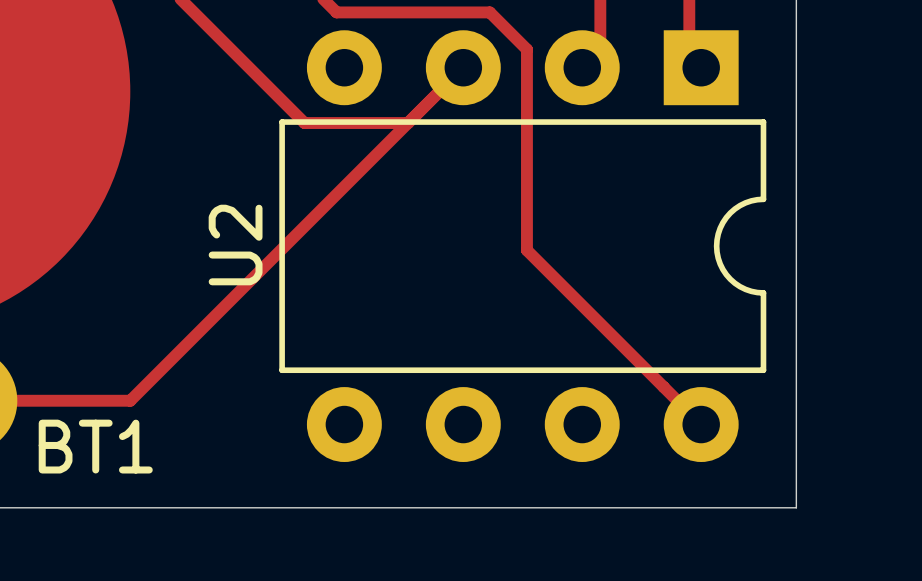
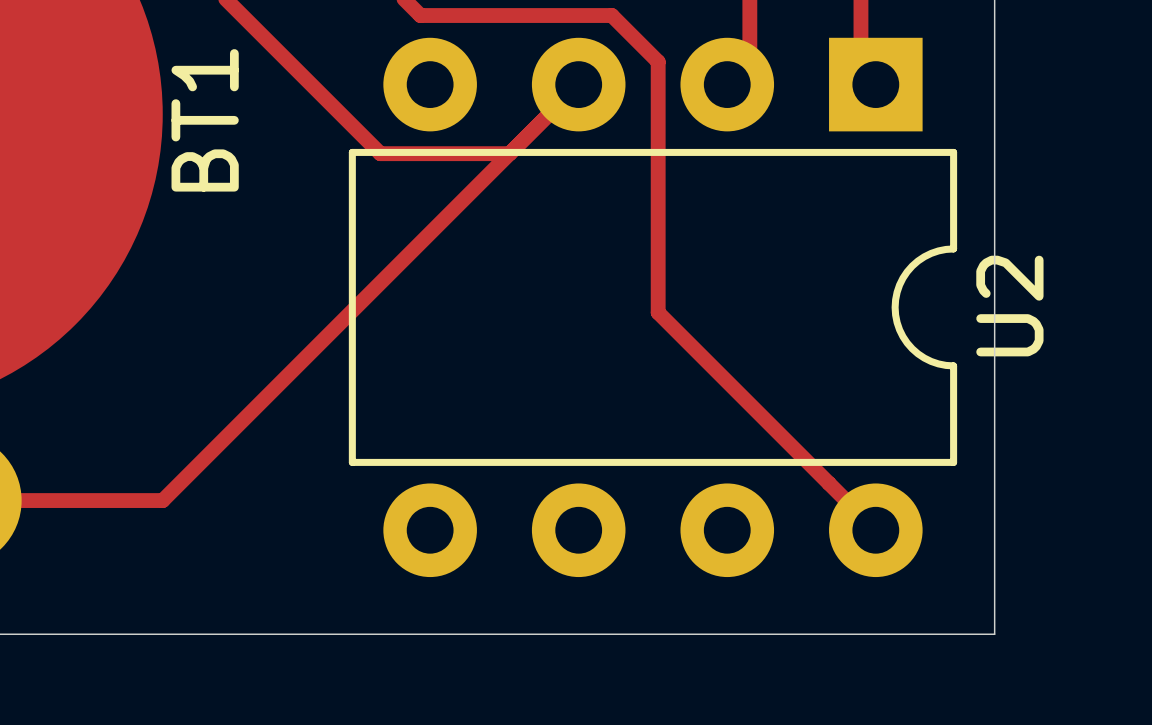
U2 name position: U2 (235, 245) -> U2 (1009, 306)
BT1 name rotation: 0° (95, 446) -> 90° counterclockwise (205, 120)
BT1 name position: BT1 (95, 446) -> BT1 (205, 120)

